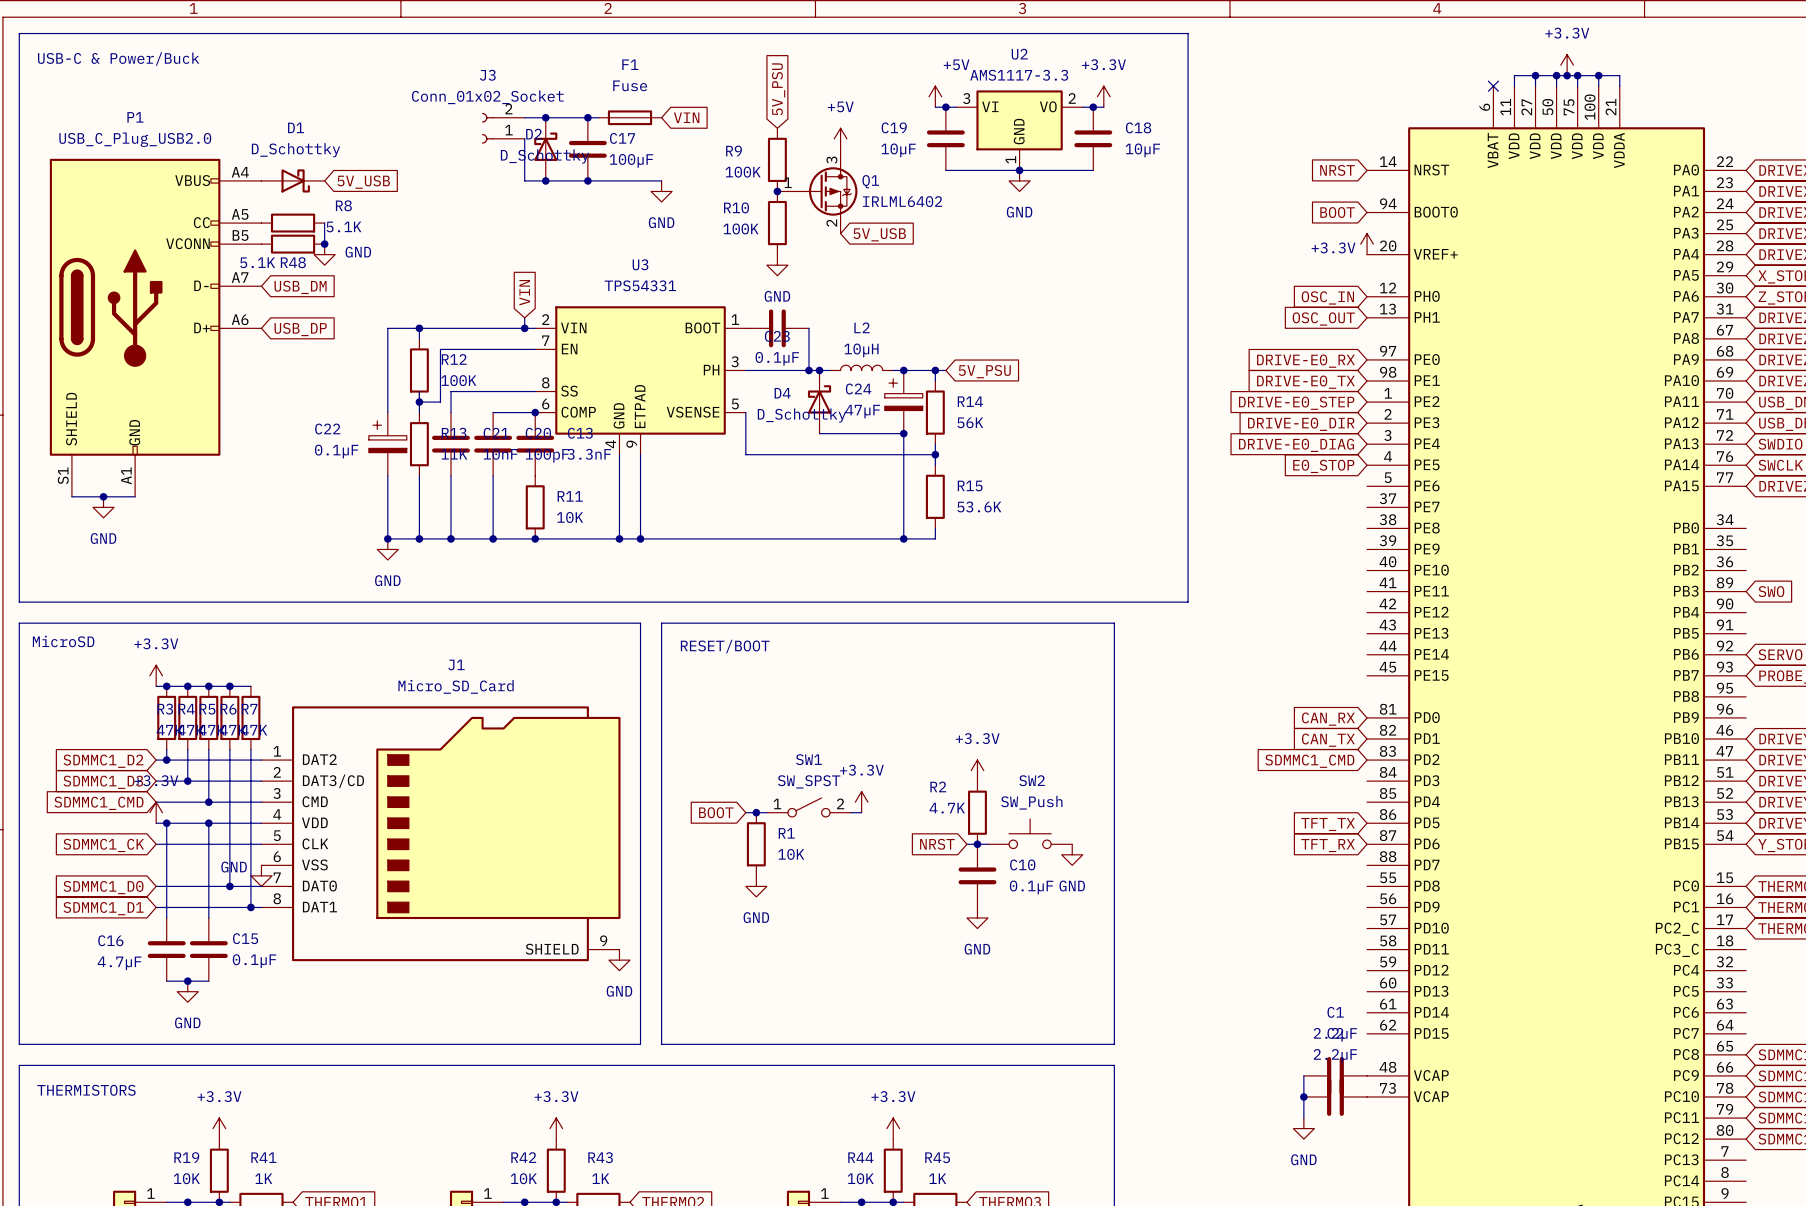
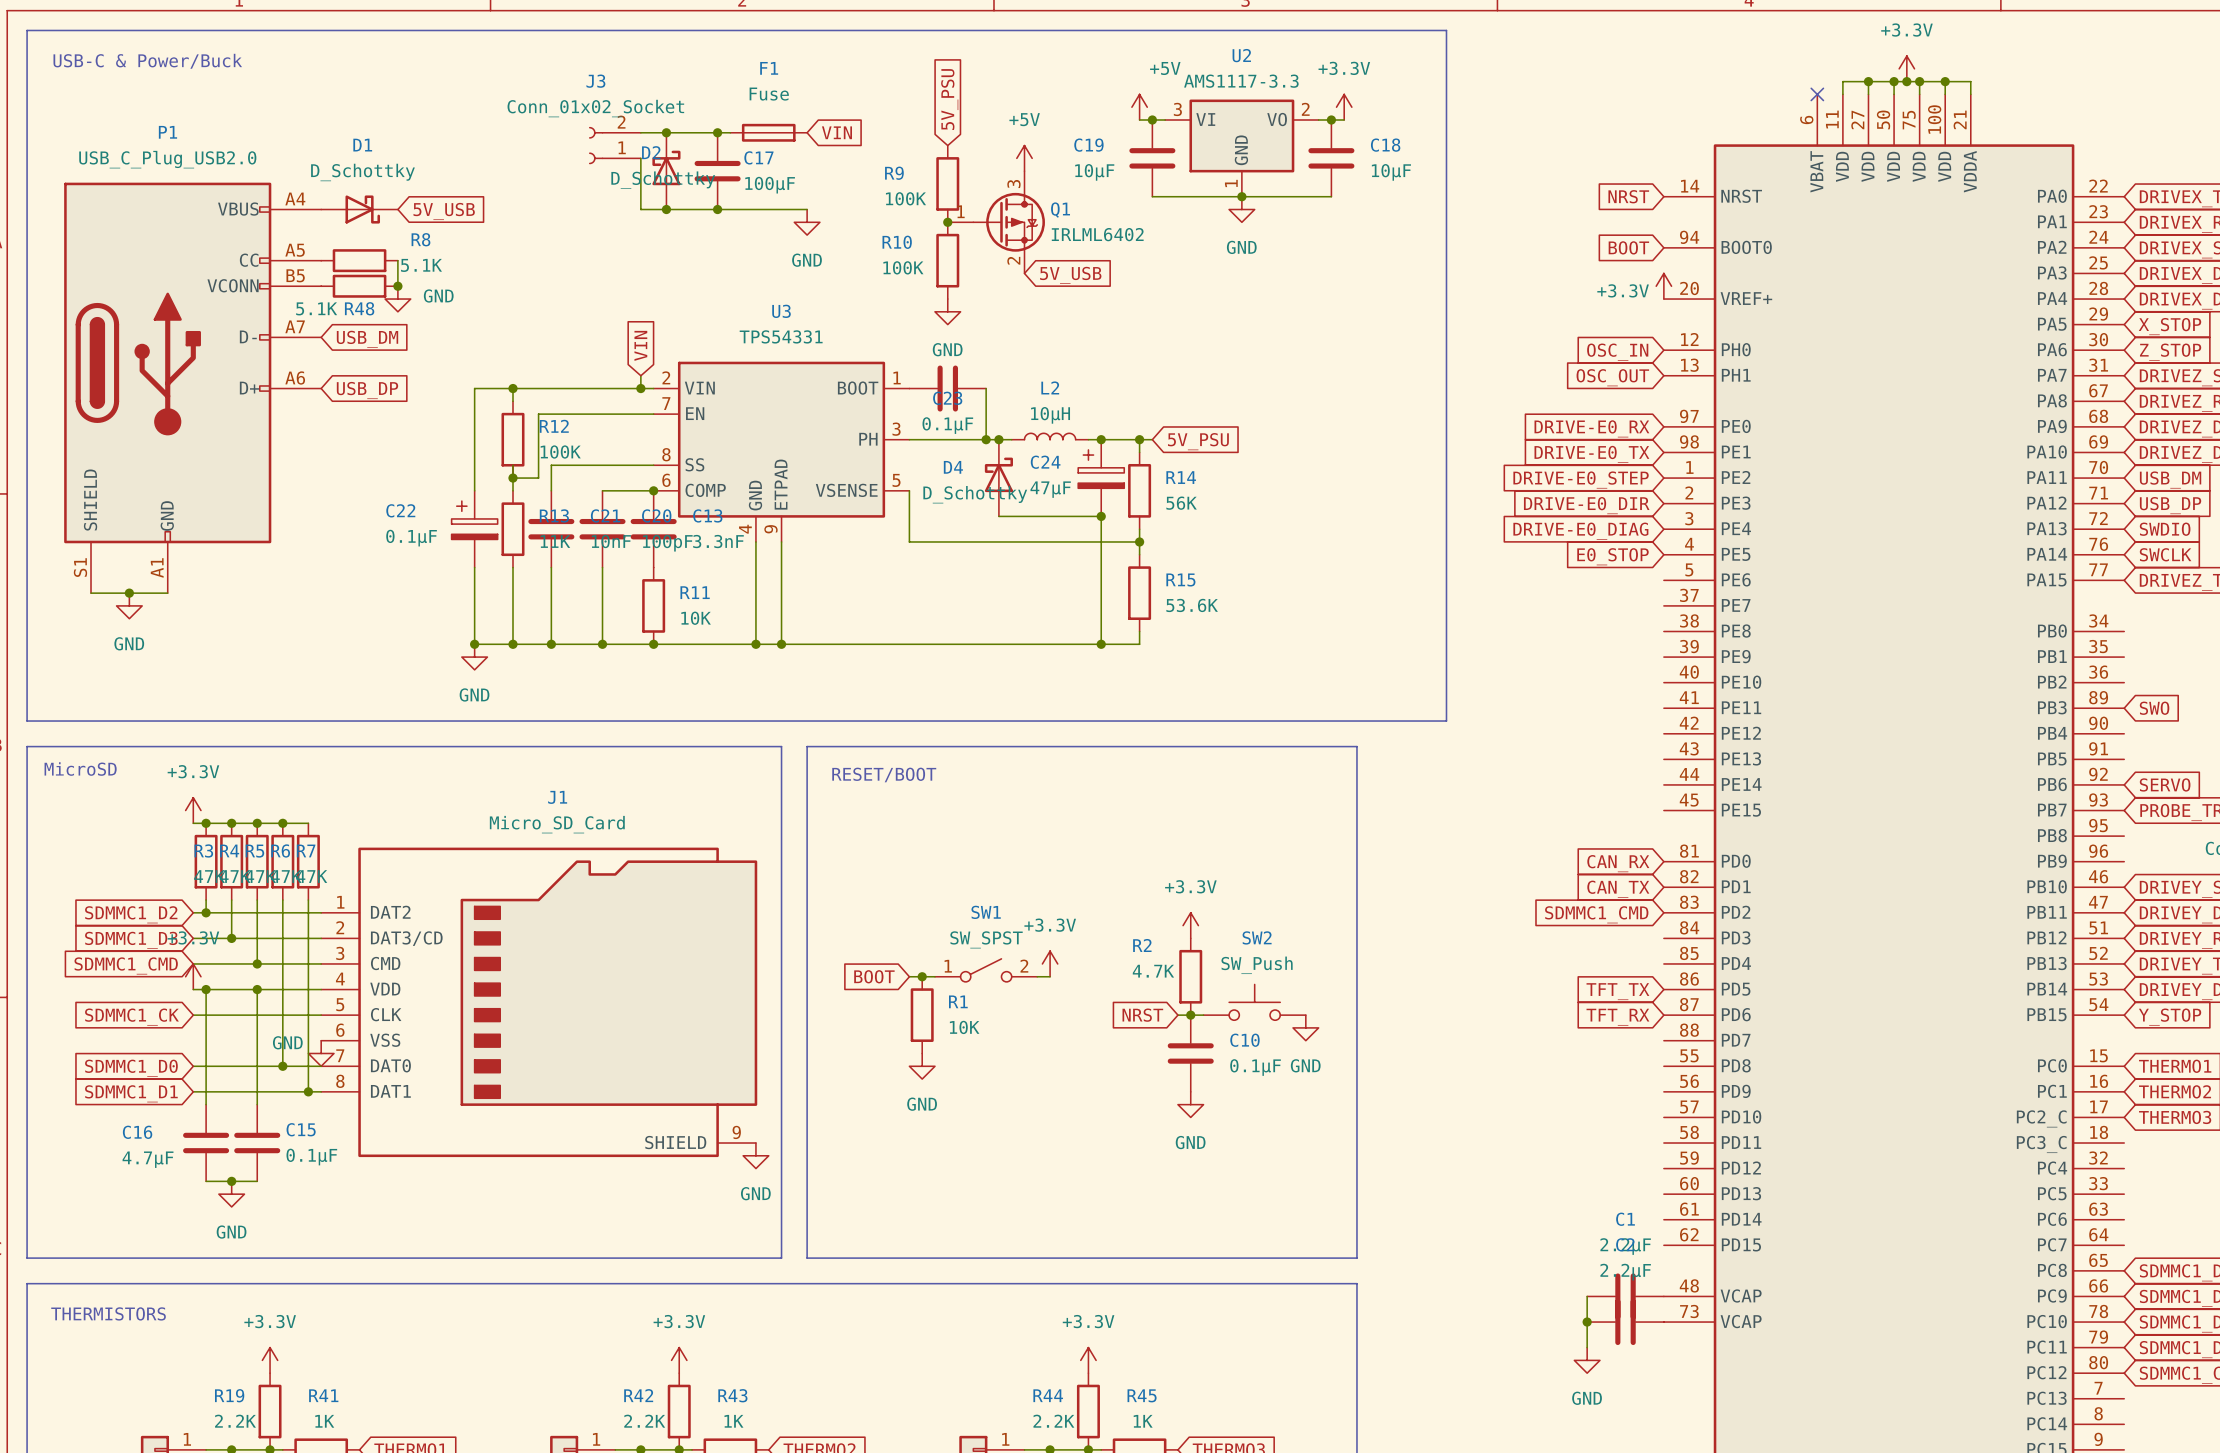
R19 value: 10K (186, 1178) -> 2.2K (235, 1421)
R42 value: 10K (523, 1178) -> 2.2K (644, 1421)
R44 value: 10K (860, 1178) -> 2.2K (1053, 1421)

